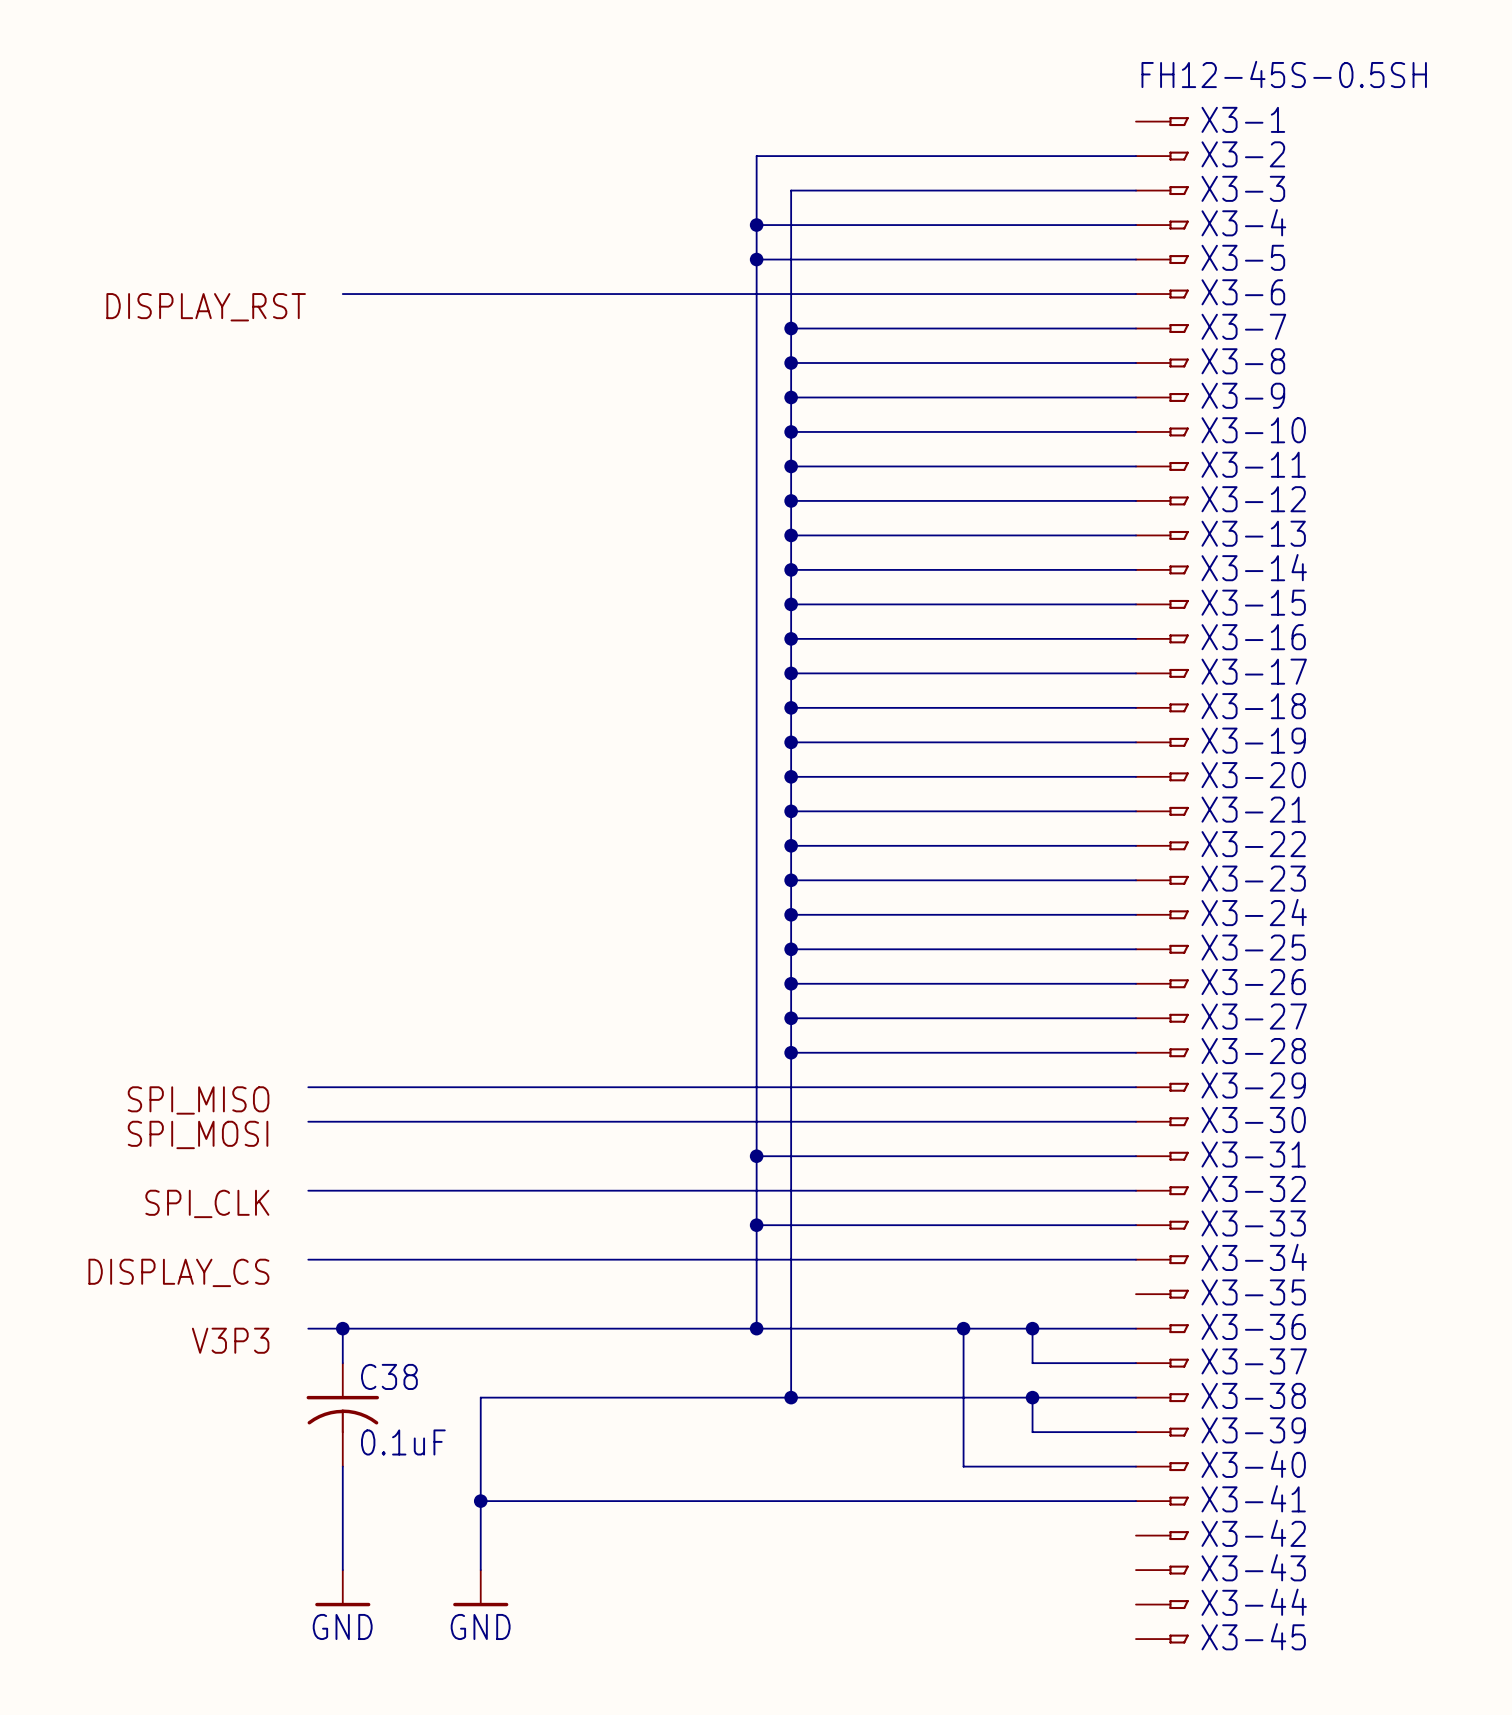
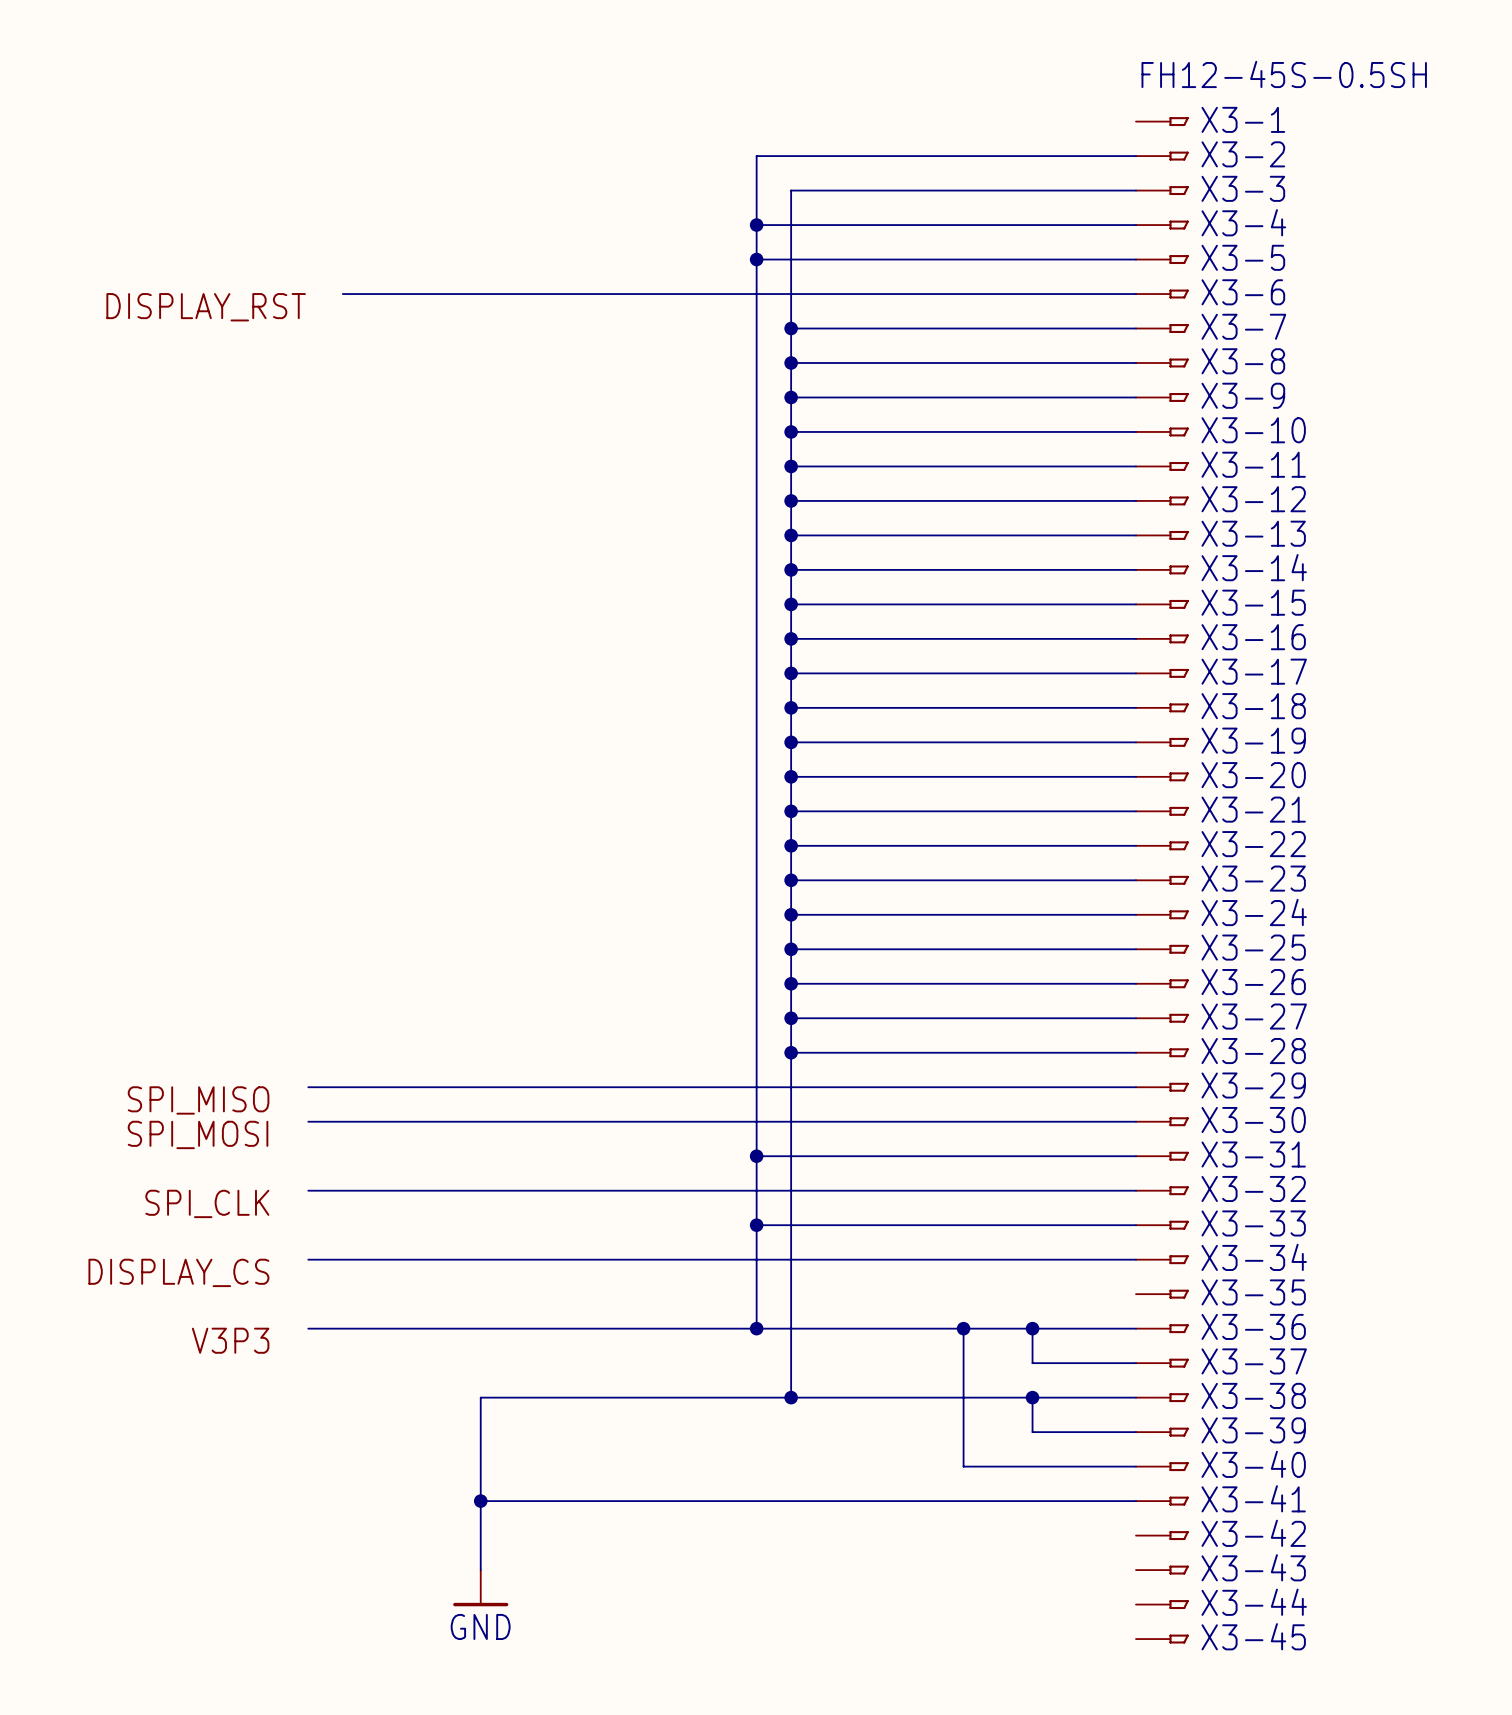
wire: (342, 1328) (342, 1363) -> none
junction: (342, 1328) -> none
C38: 0.1uF (342, 1414) -> none
wire: (342, 1466) (342, 1570) -> none
power symbol: GND (342, 1588) -> none

